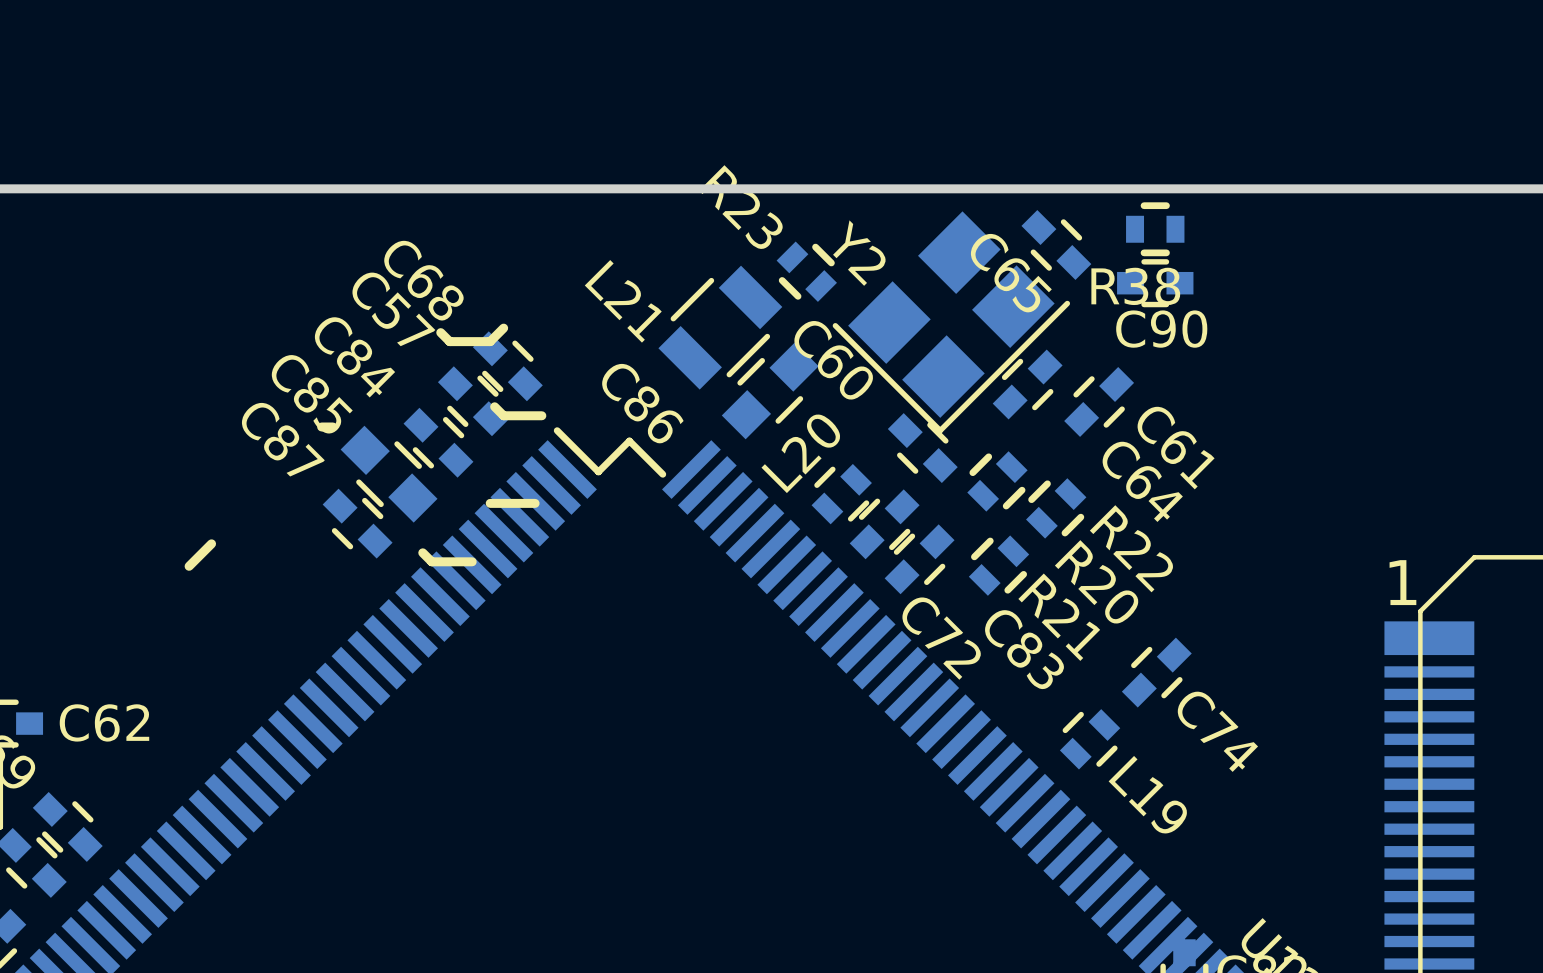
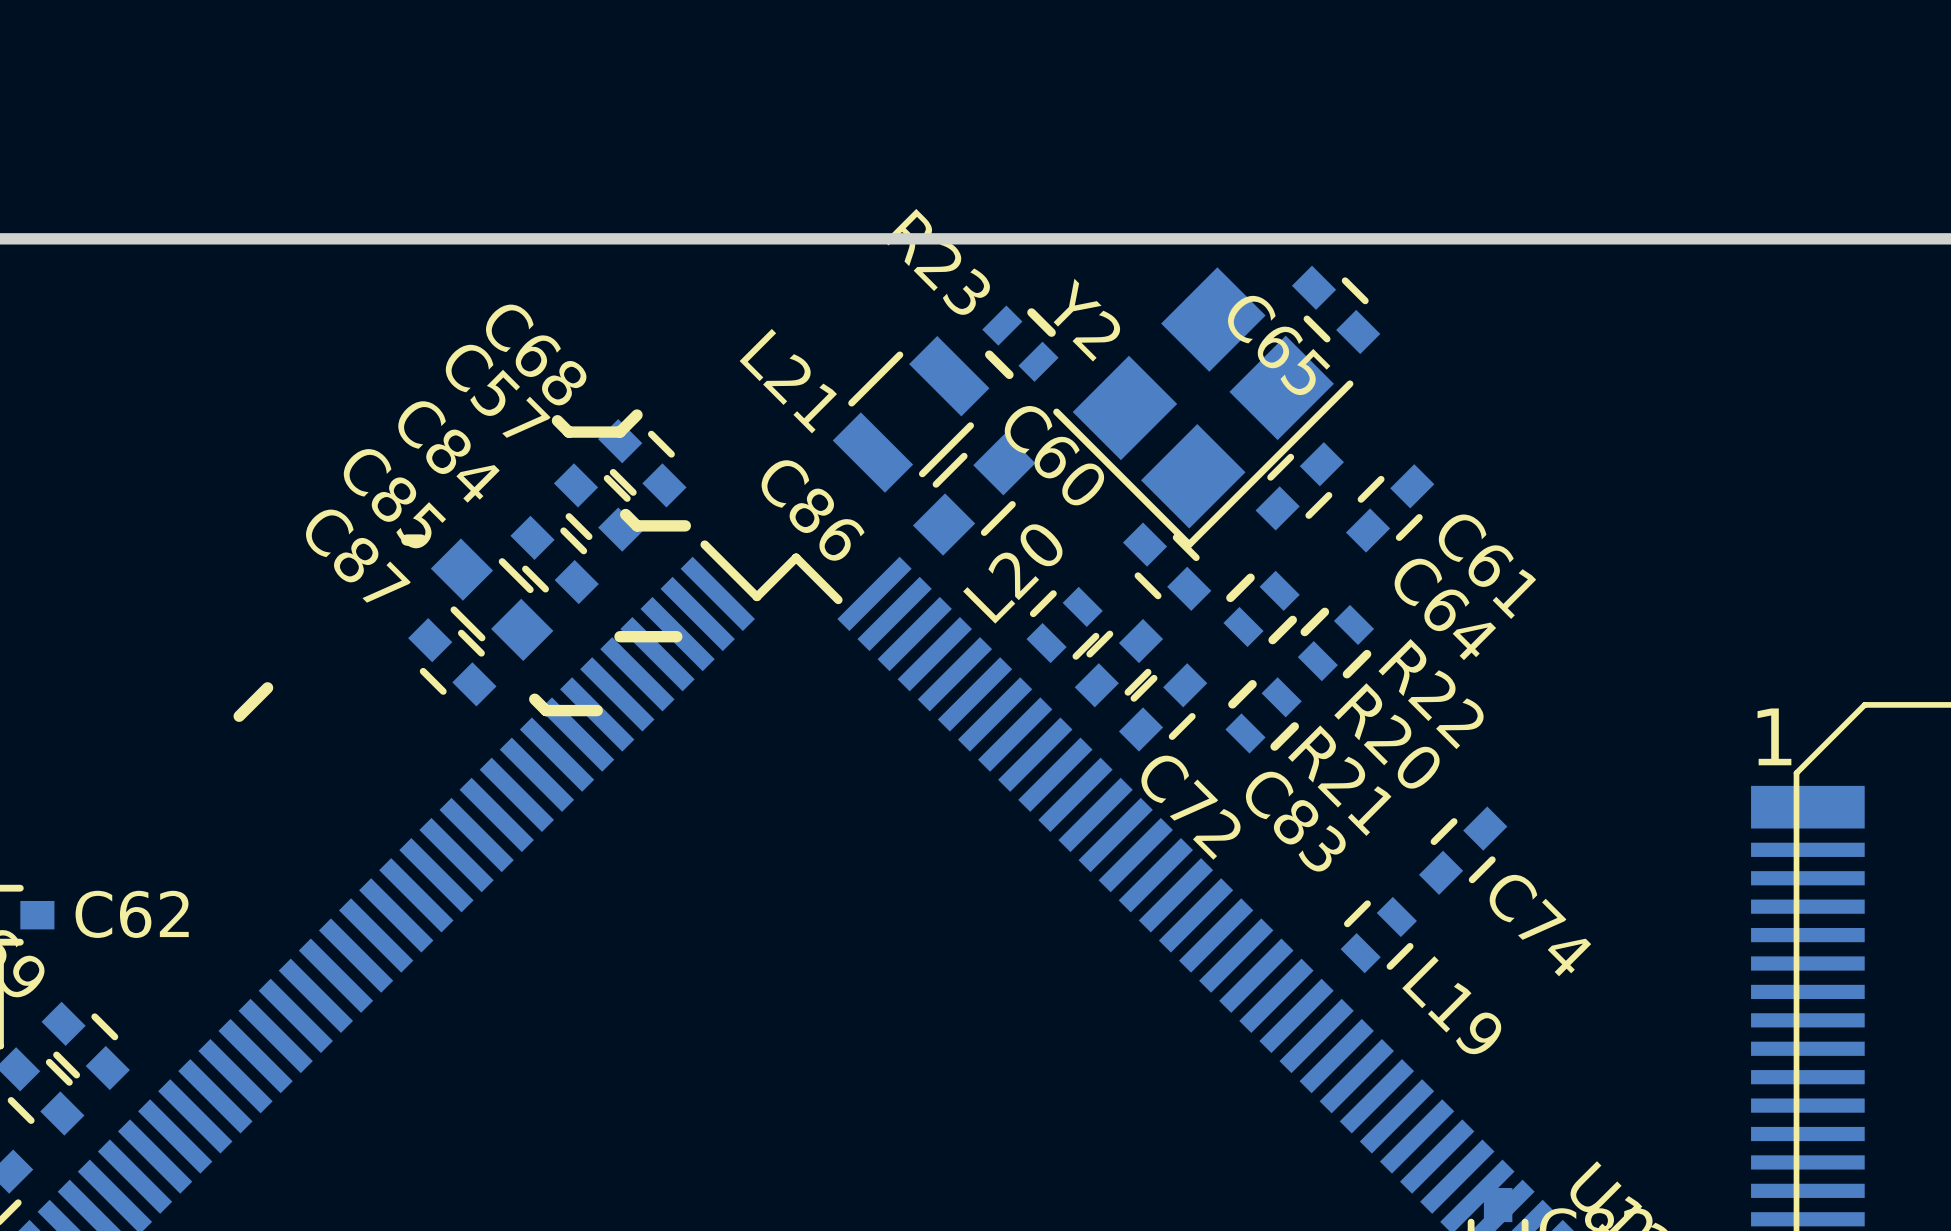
R38: (1155, 229) -> none
C90: (1155, 283) -> none

